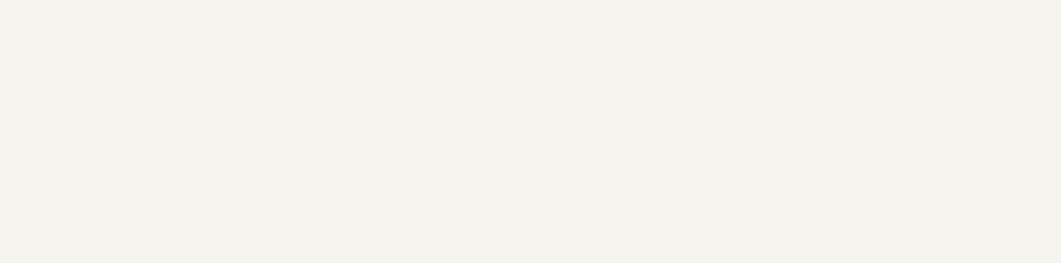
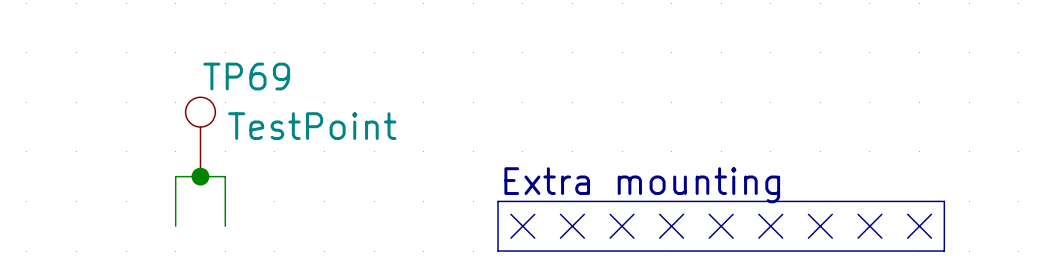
TP69: none -> TestPoint (200, 136)
junction: none -> (200, 176)
text: none -> Extra mounting (642, 185)
line: none -> (498, 201) (498, 251) (944, 251) (944, 201) (498, 201)
wire: none -> (175, 226) (175, 176) (225, 176) (225, 226)
no-connect mark: none -> (522, 226)
no-connect mark: none -> (572, 226)
no-connect mark: none -> (622, 226)
no-connect mark: none -> (671, 226)
no-connect mark: none -> (721, 226)
no-connect mark: none -> (770, 226)
no-connect mark: none -> (820, 226)
no-connect mark: none -> (869, 226)
no-connect mark: none -> (919, 226)

